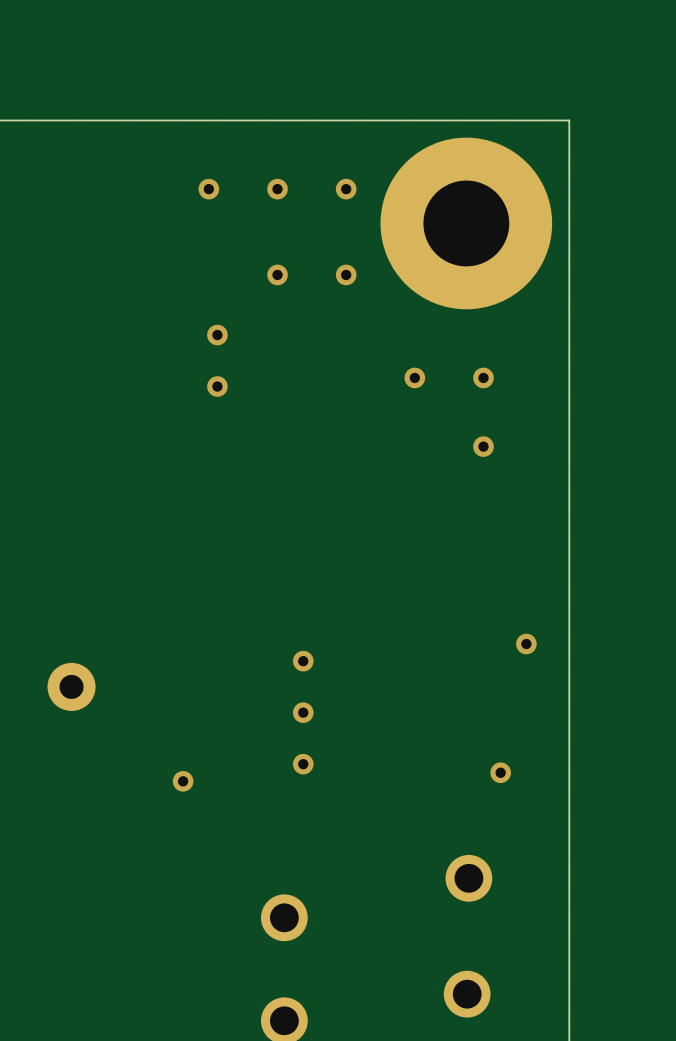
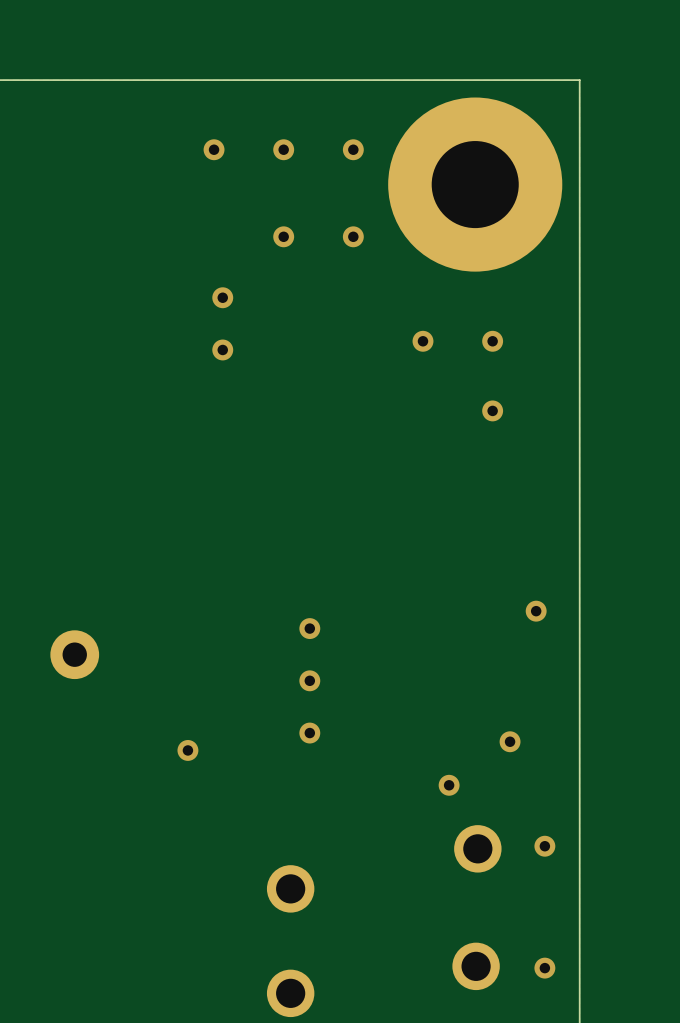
via: none -> (449, 785)
via: none -> (544, 846)
via: none -> (544, 968)

